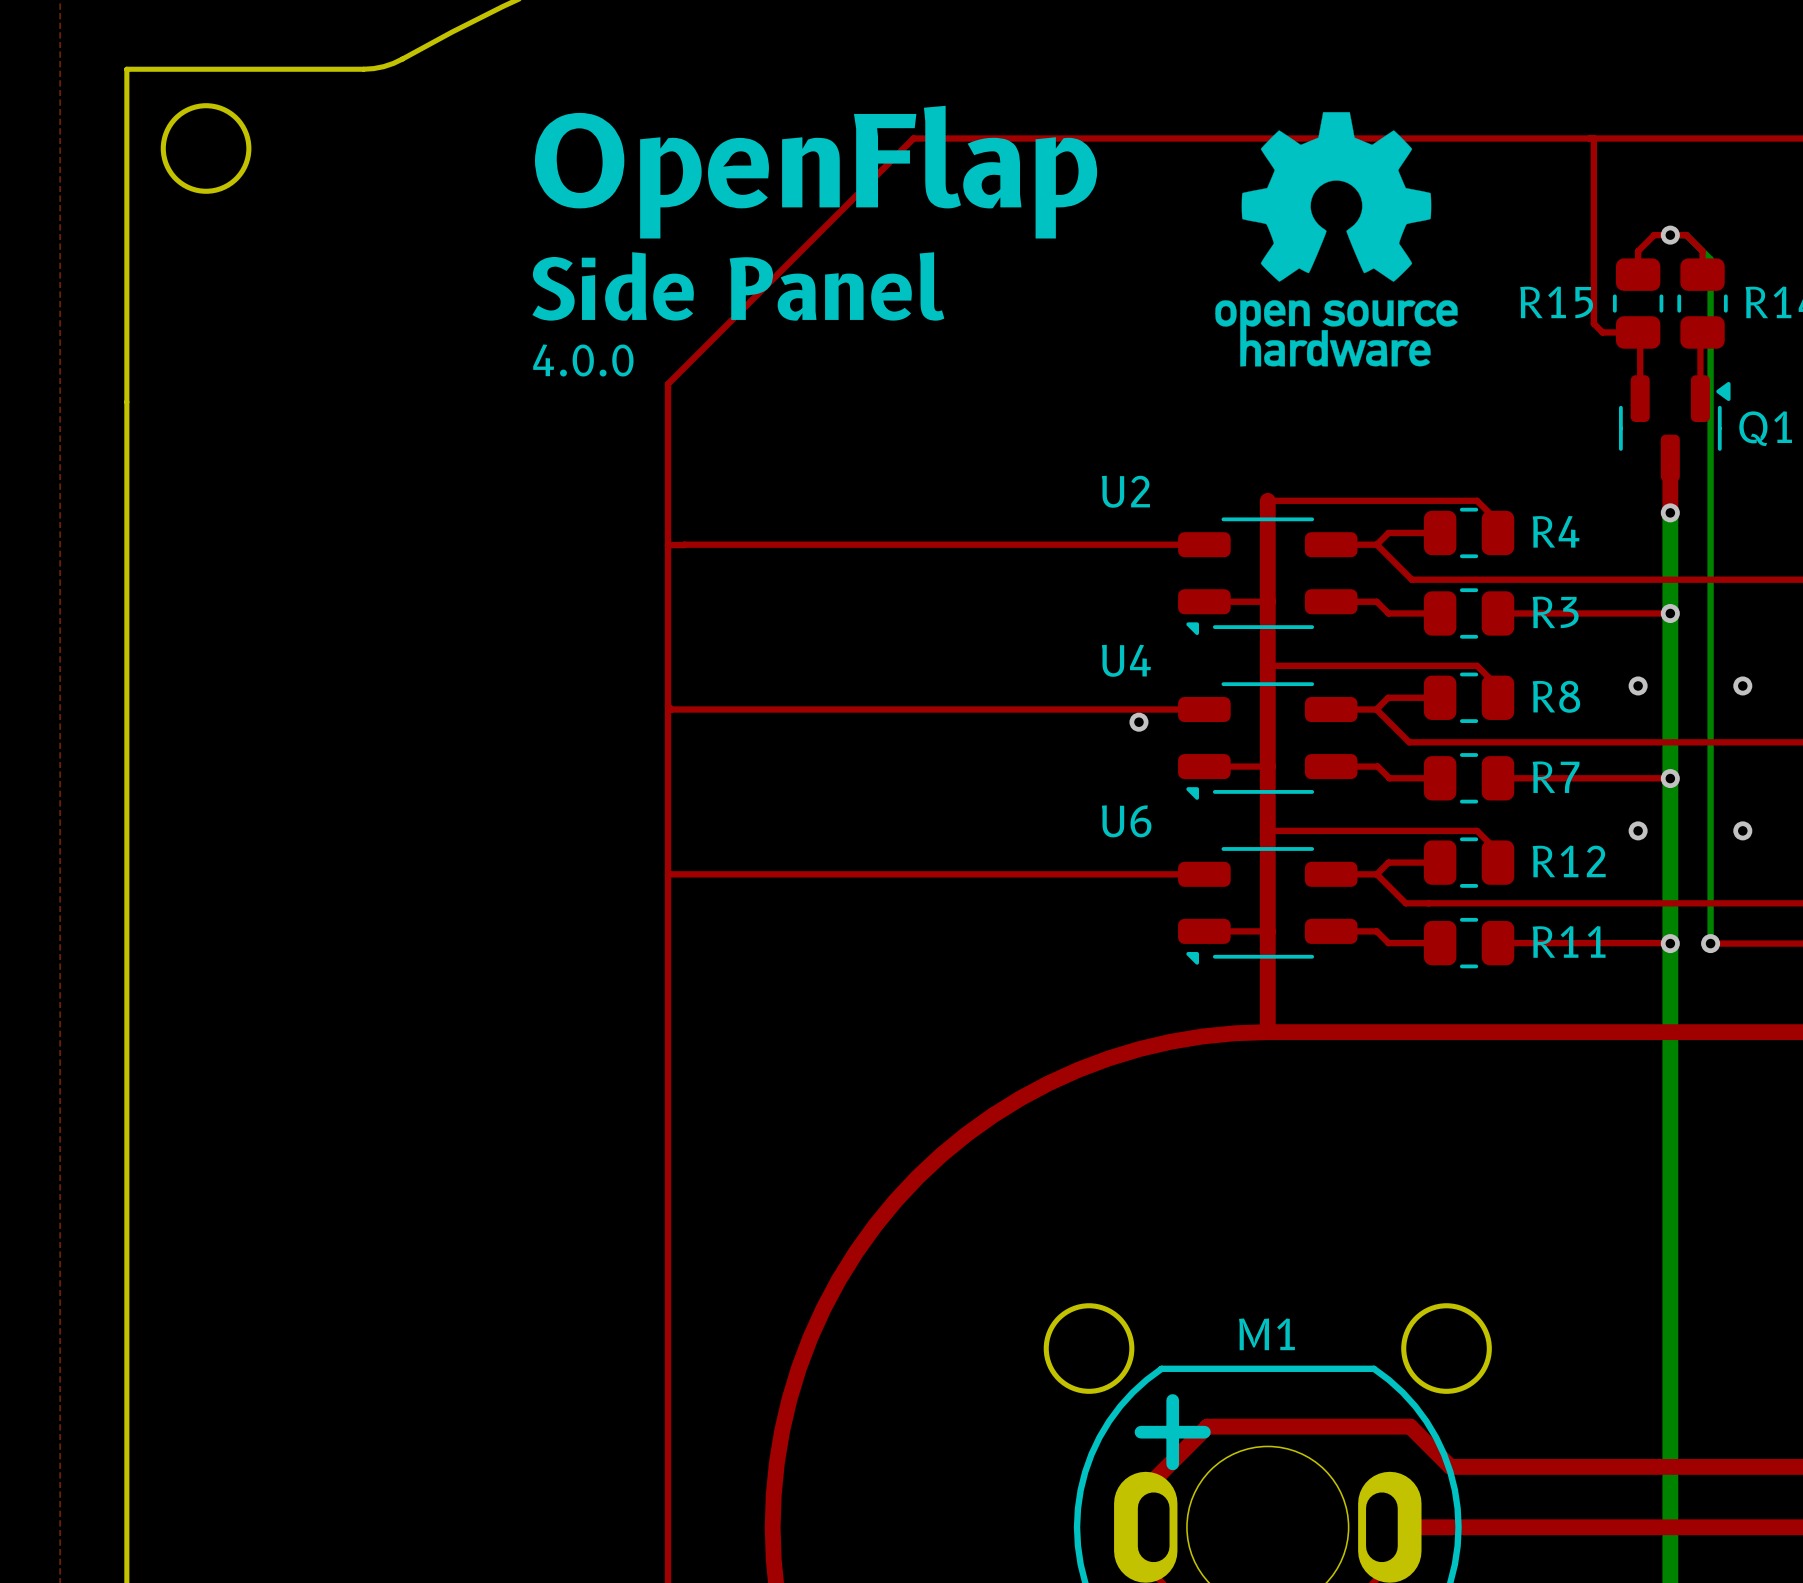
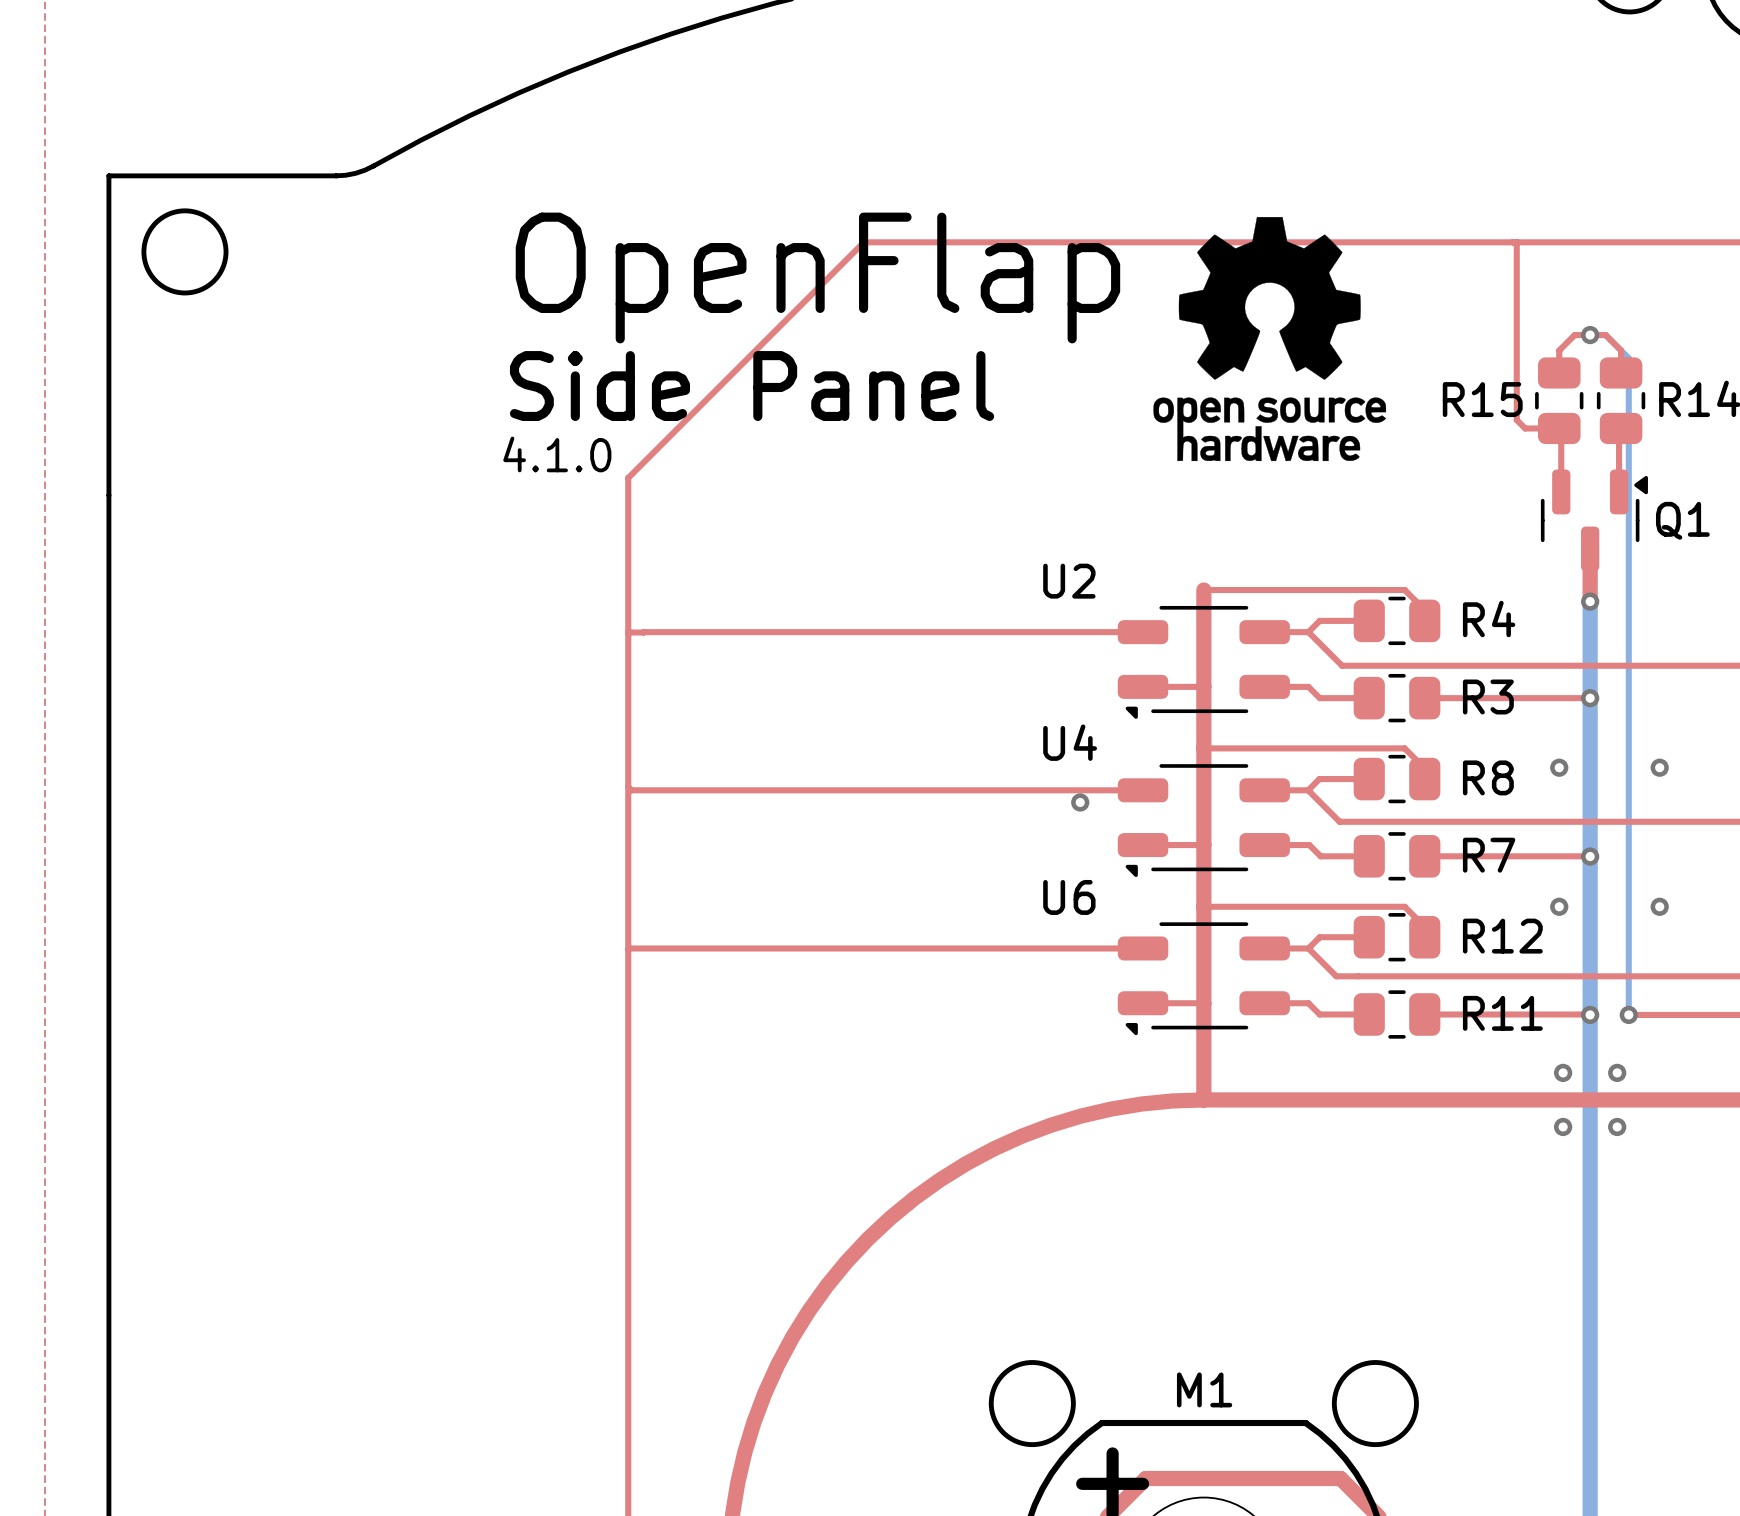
text: 4.0.0 (583, 360) -> 4.1.0 (557, 454)
via: none -> (1563, 1072)
via: none -> (1617, 1072)
via: none -> (1563, 1126)
via: none -> (1617, 1126)

